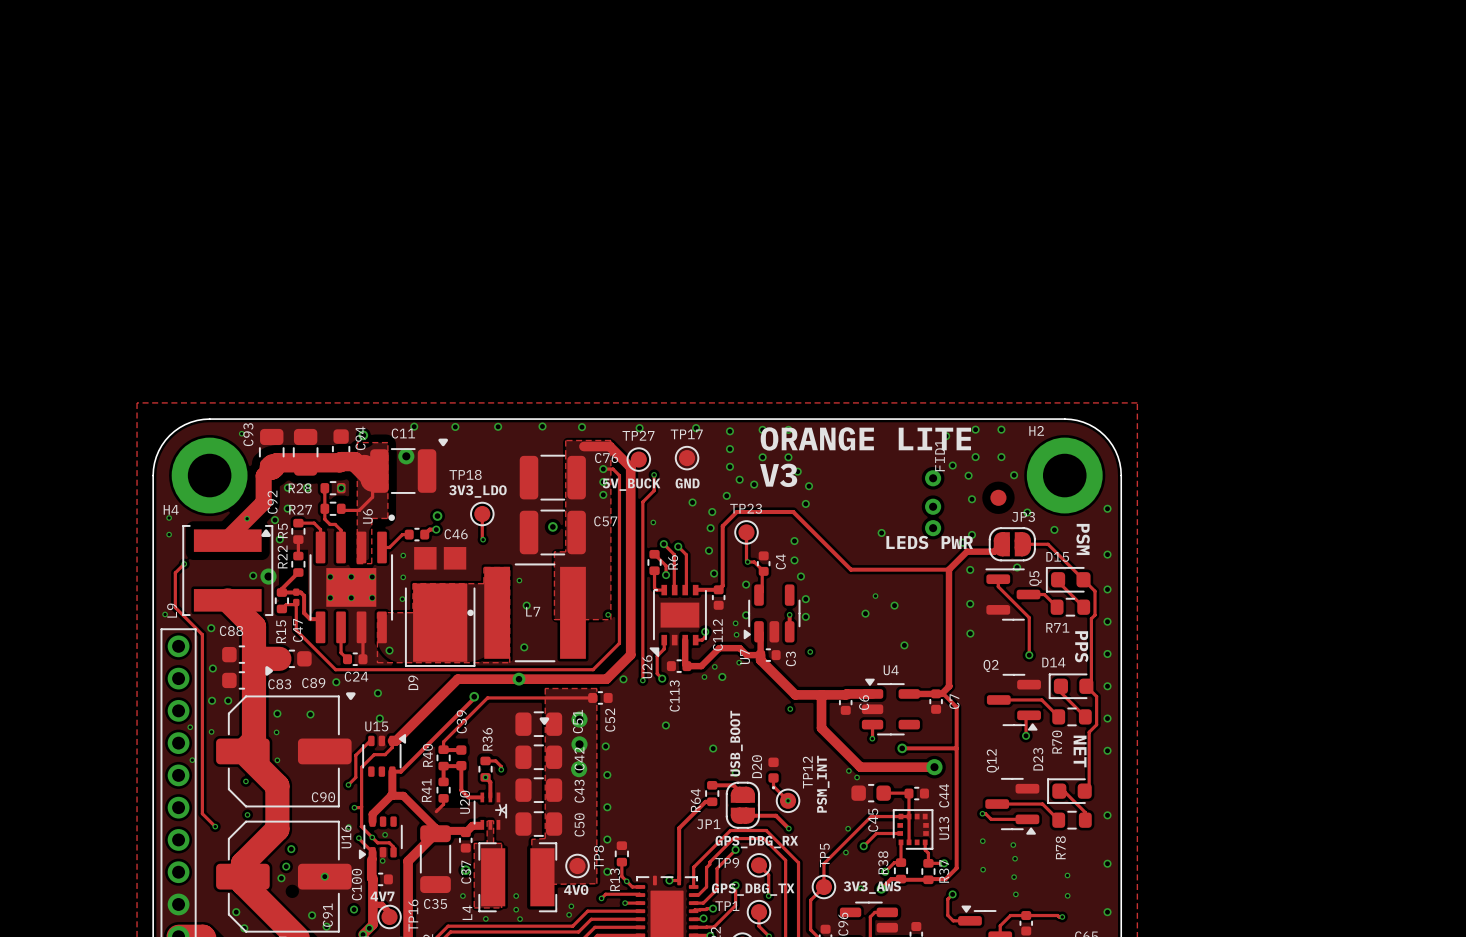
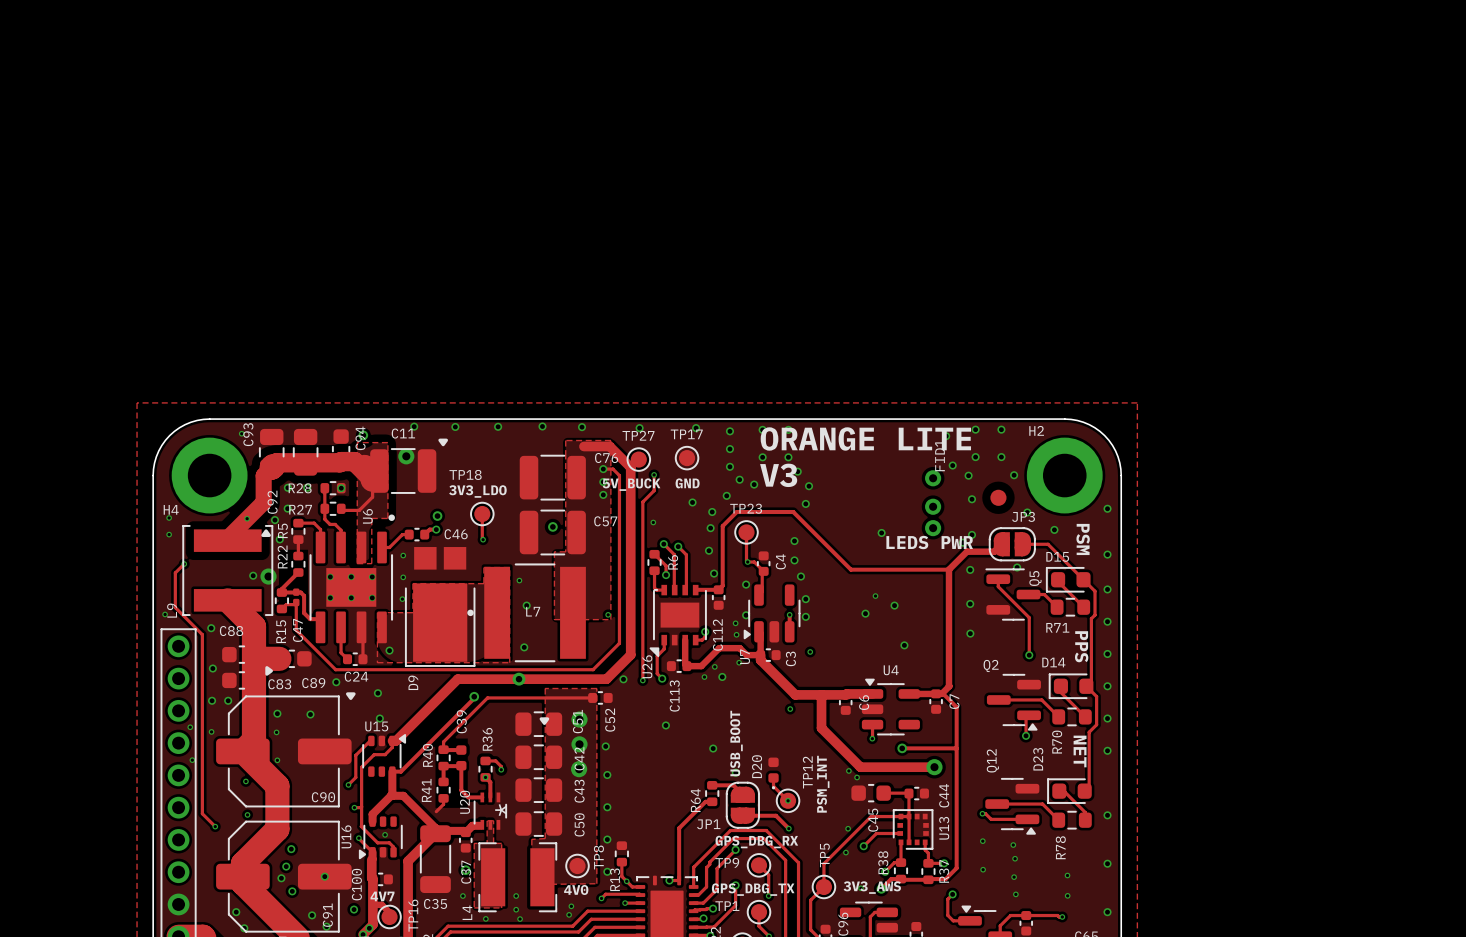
via: (348, 827) -> none
via: (372, 837) -> none
via: (382, 860) -> none
via: none -> (292, 891)

